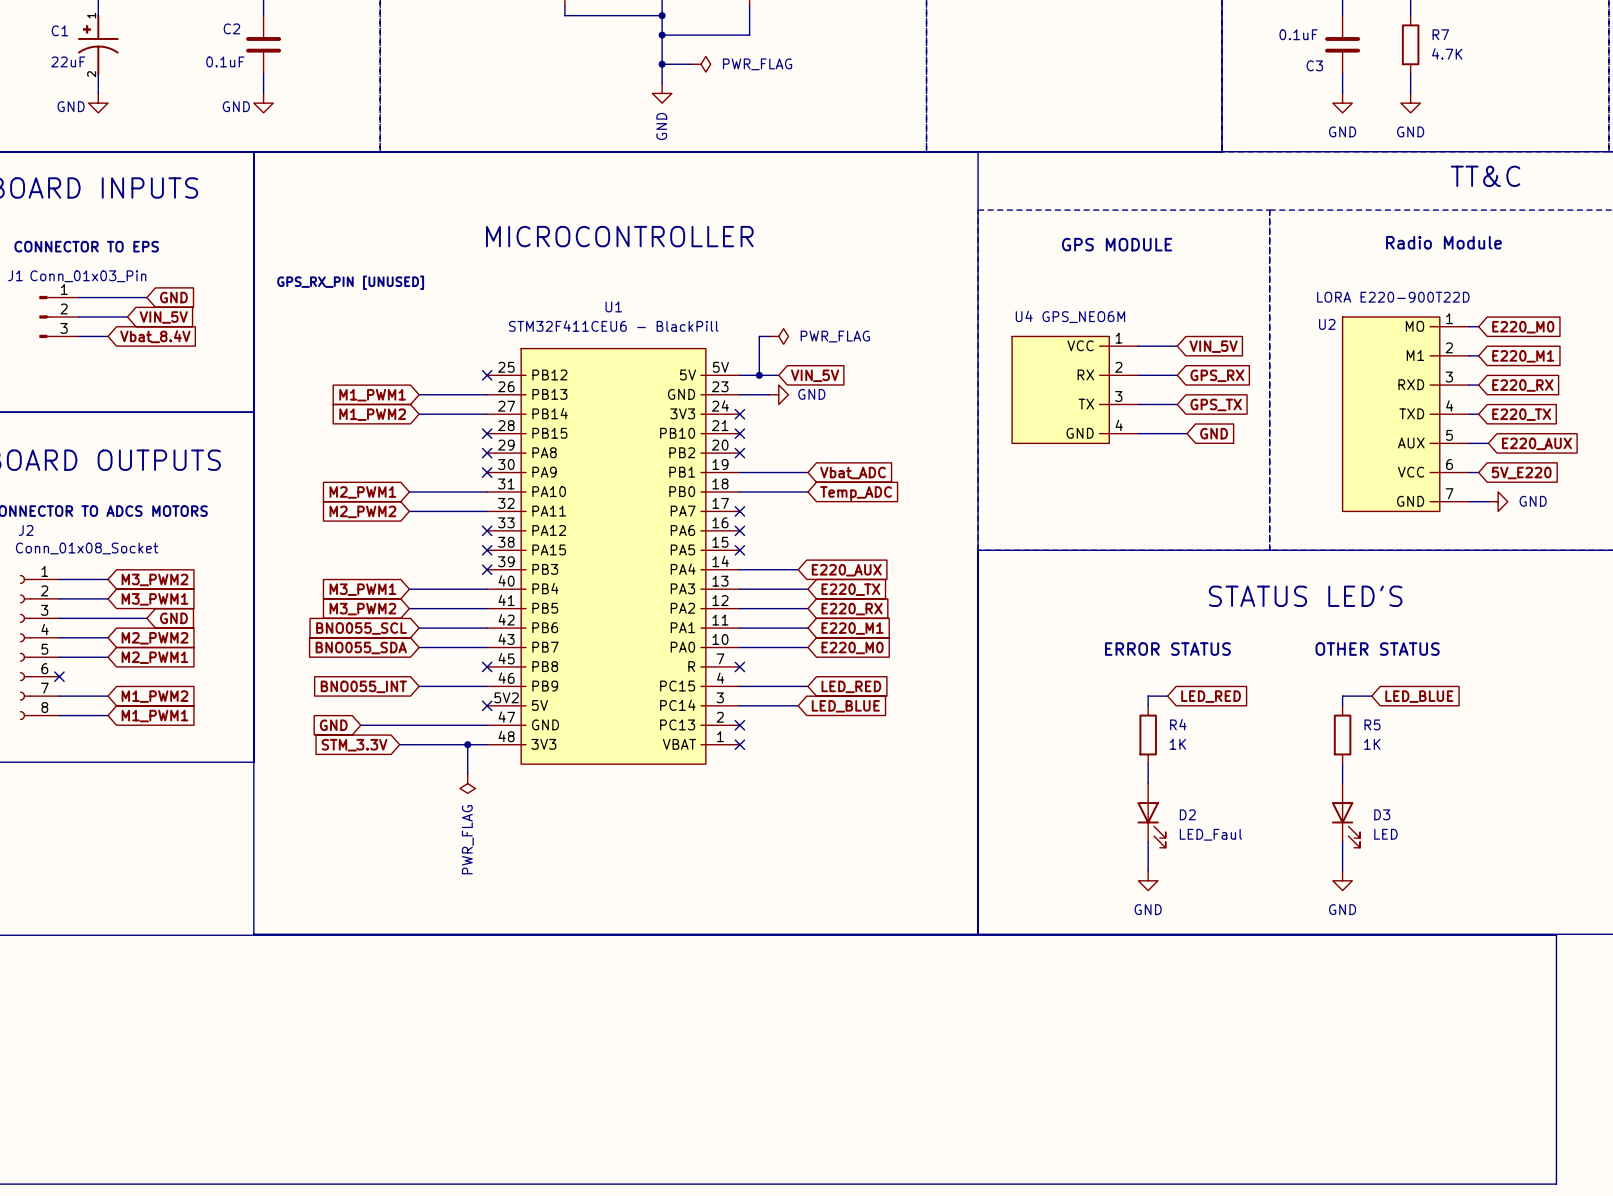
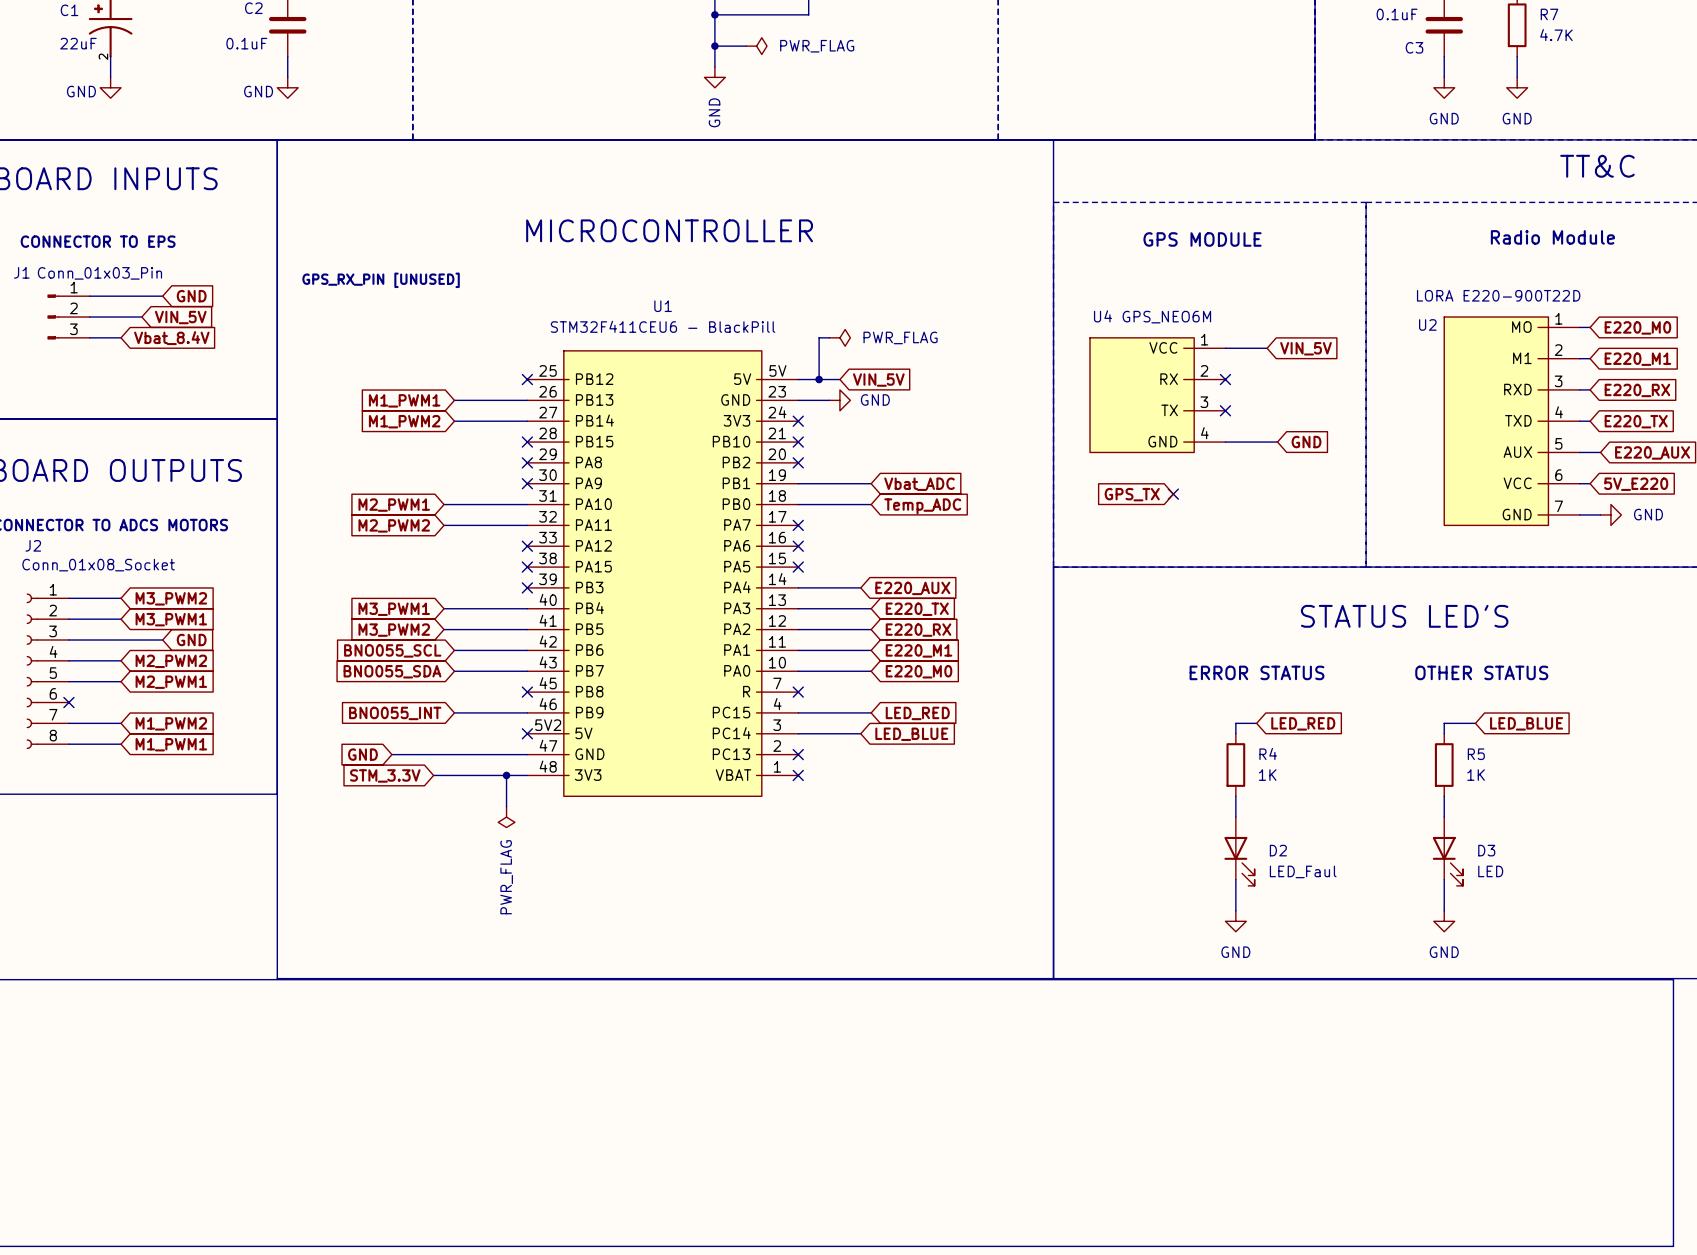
wire: (1138, 375) (1177, 375) -> none
no-connect mark: none -> (1225, 379)
global label: GPS_RX (1217, 375) -> none
wire: (1138, 404) (1177, 404) -> none
no-connect mark: none -> (1225, 410)
global label rotation: 0° (1216, 404) -> 180° (1132, 494)
global label position: GPS_TX (1216, 404) -> GPS_TX (1132, 494)
no-connect mark: none -> (1173, 494)

